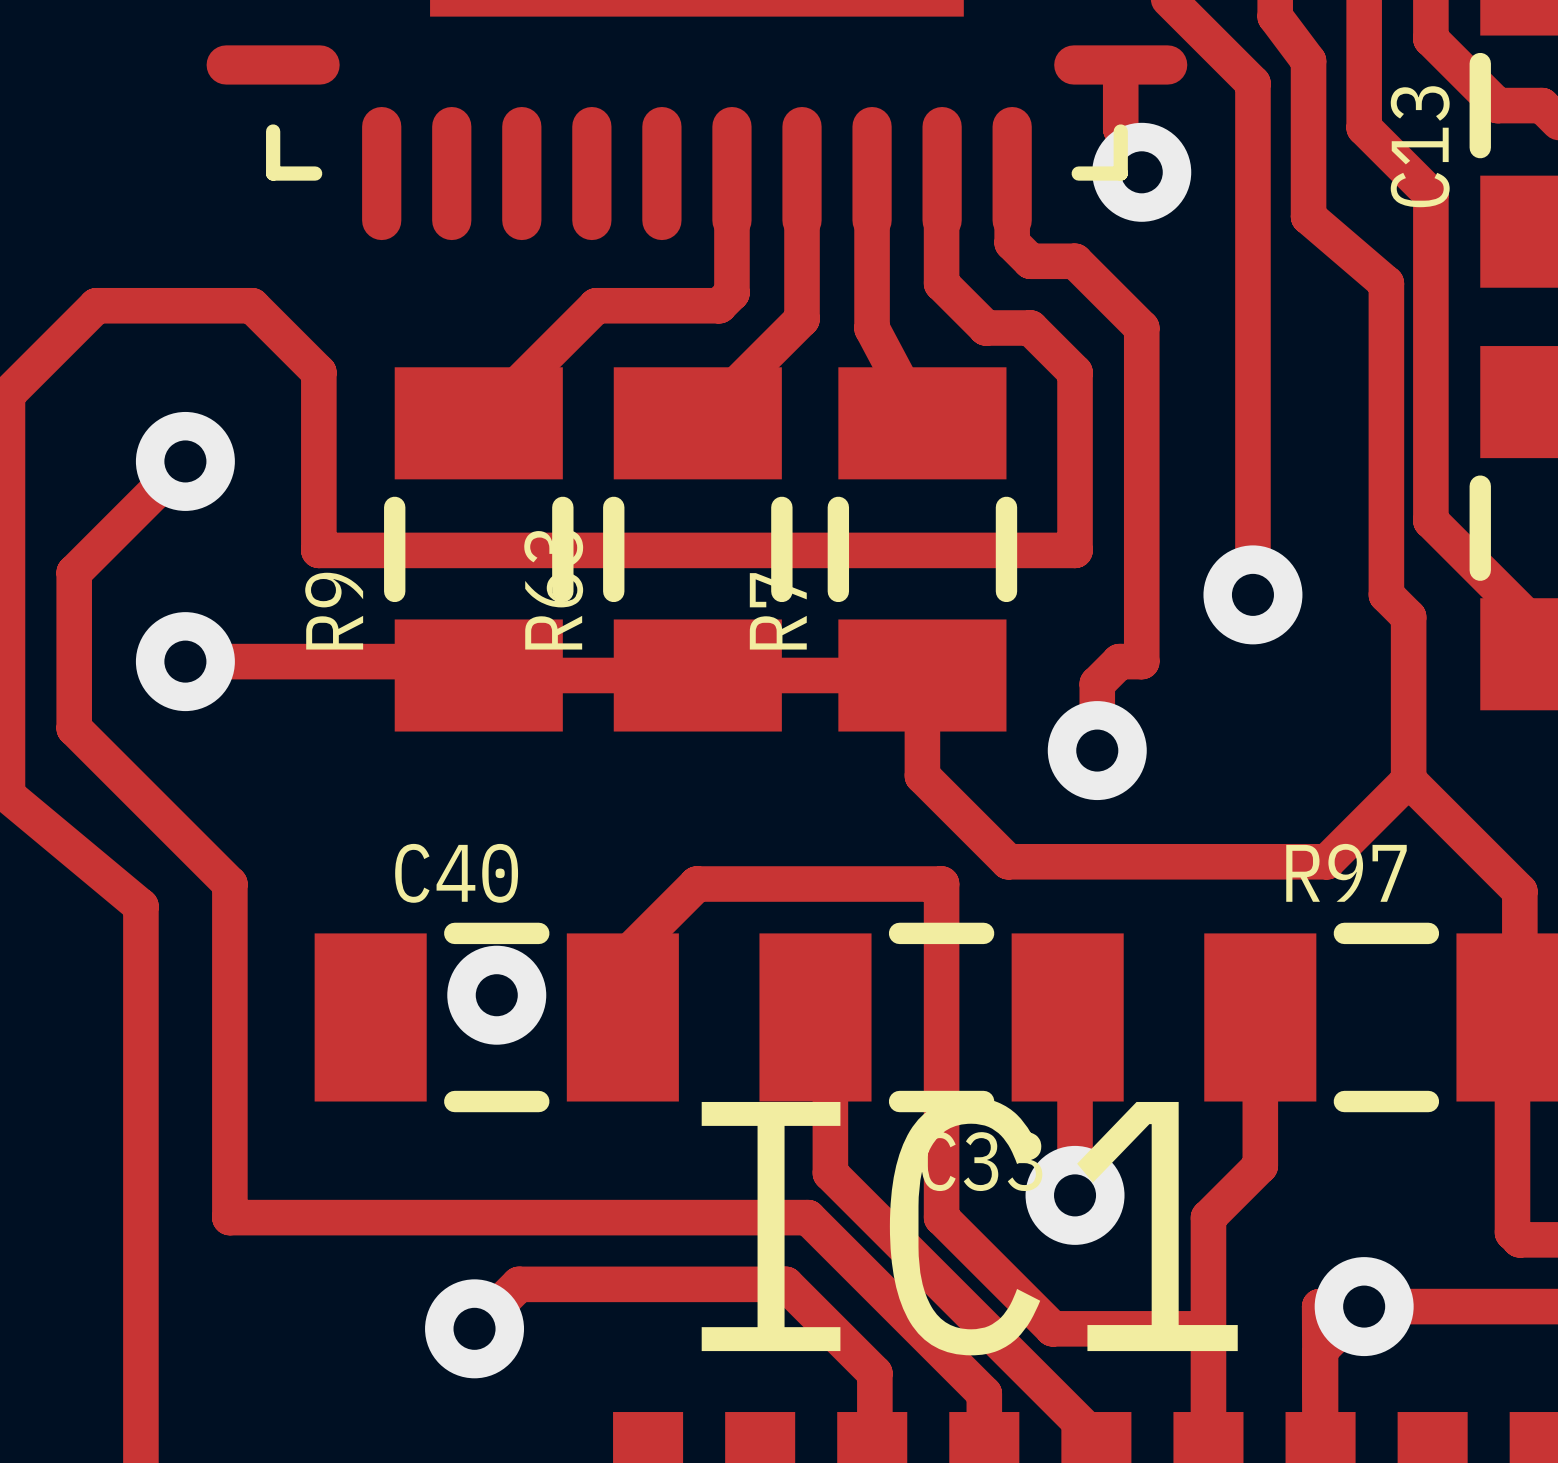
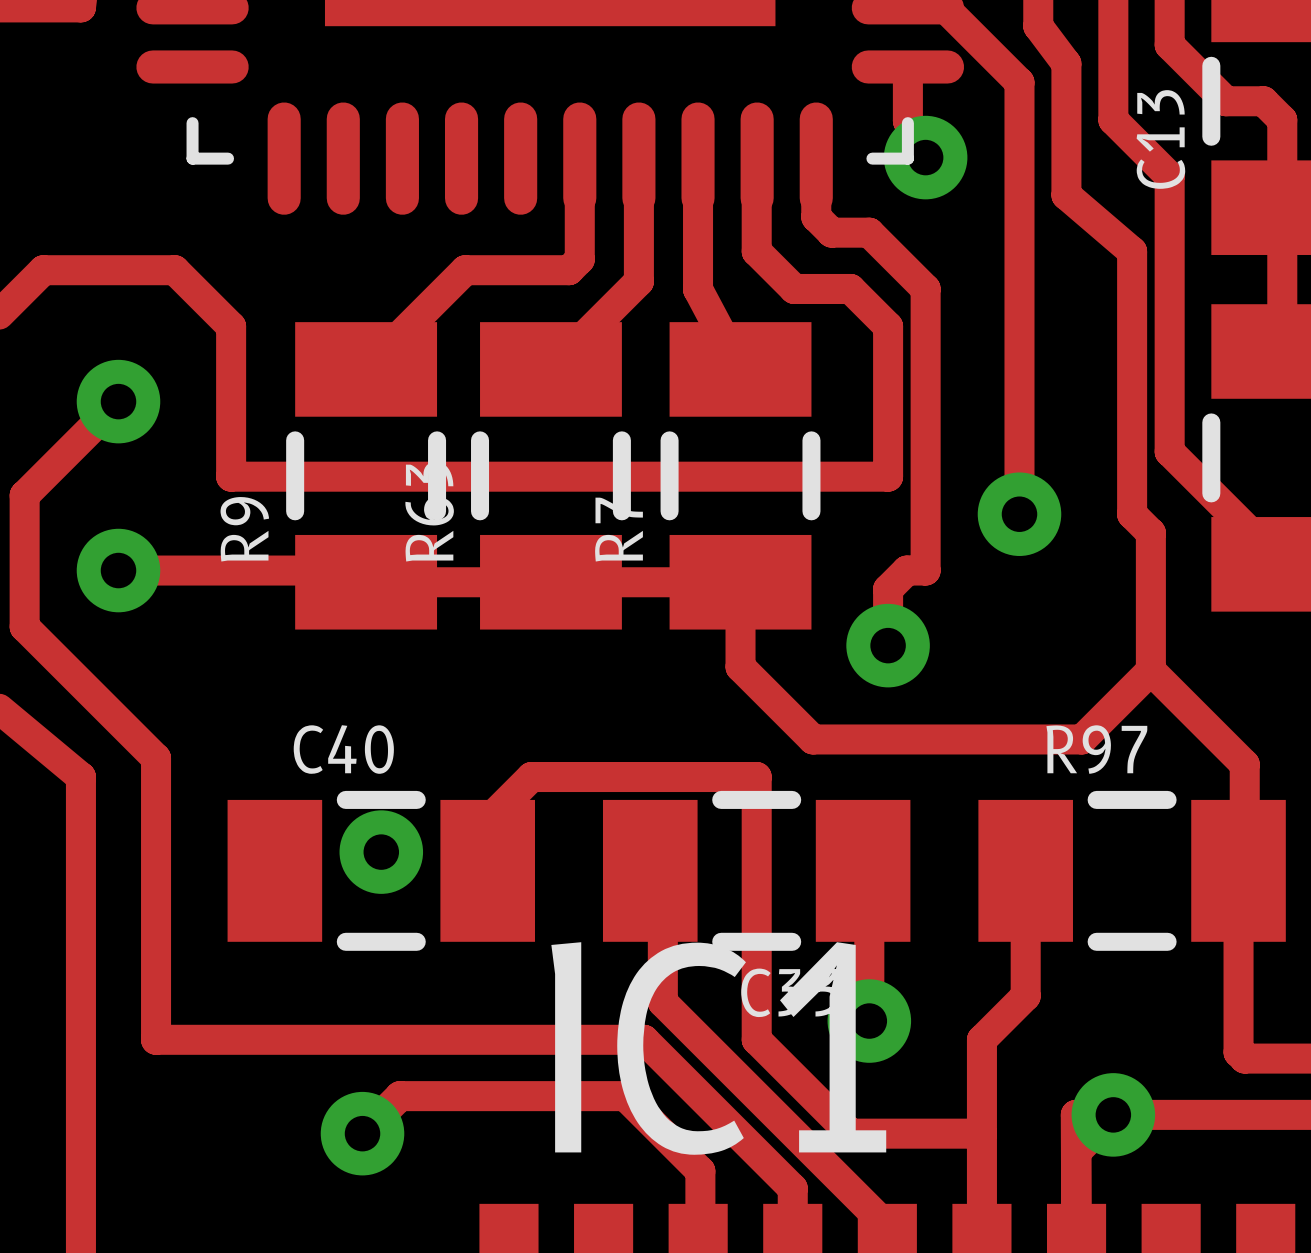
track: (1030, 328) (1075, 372) (1075, 550) -> (831, 288) (850, 288) (888, 326) (888, 476) (869, 476)
track: (674, 906) (696, 884) (941, 884) (941, 906) -> (531, 777) (756, 777)

